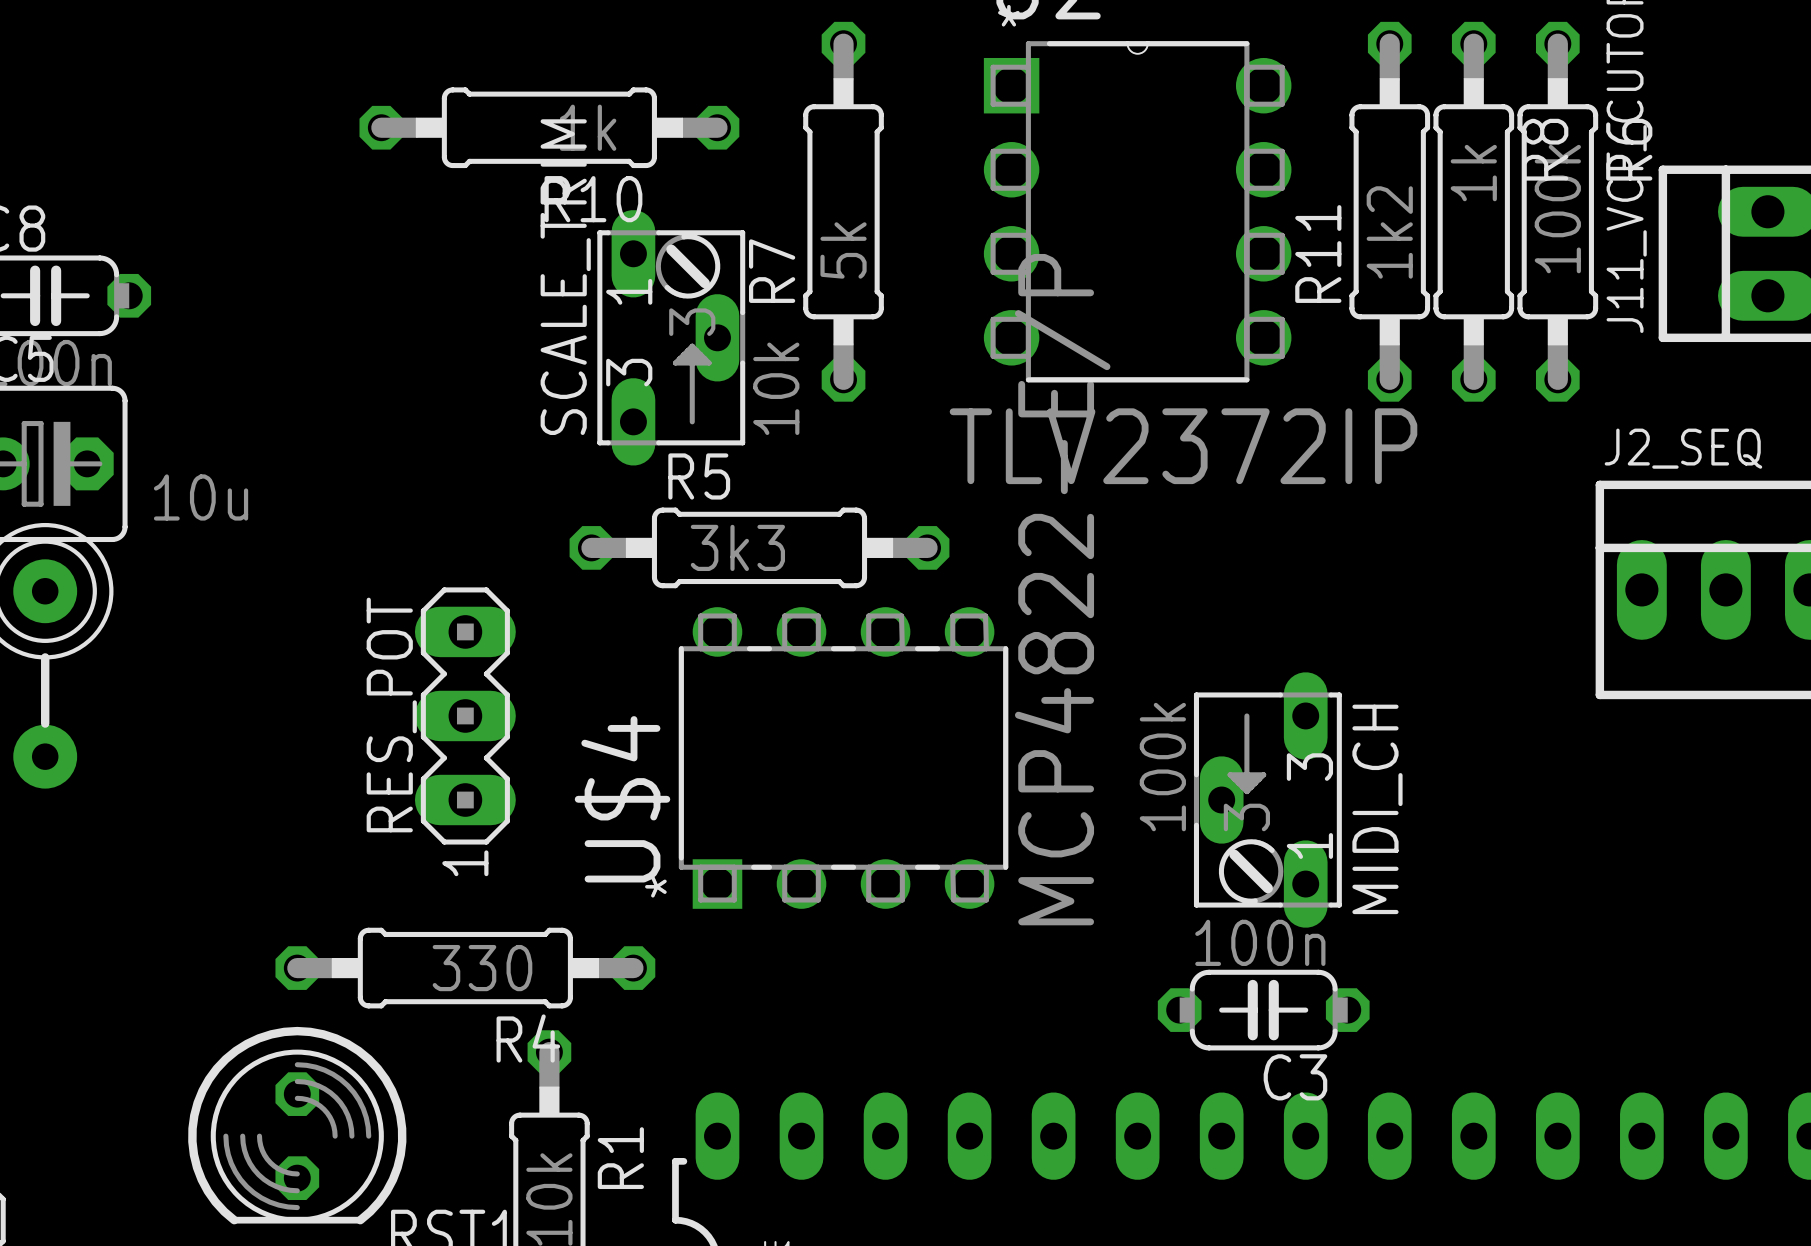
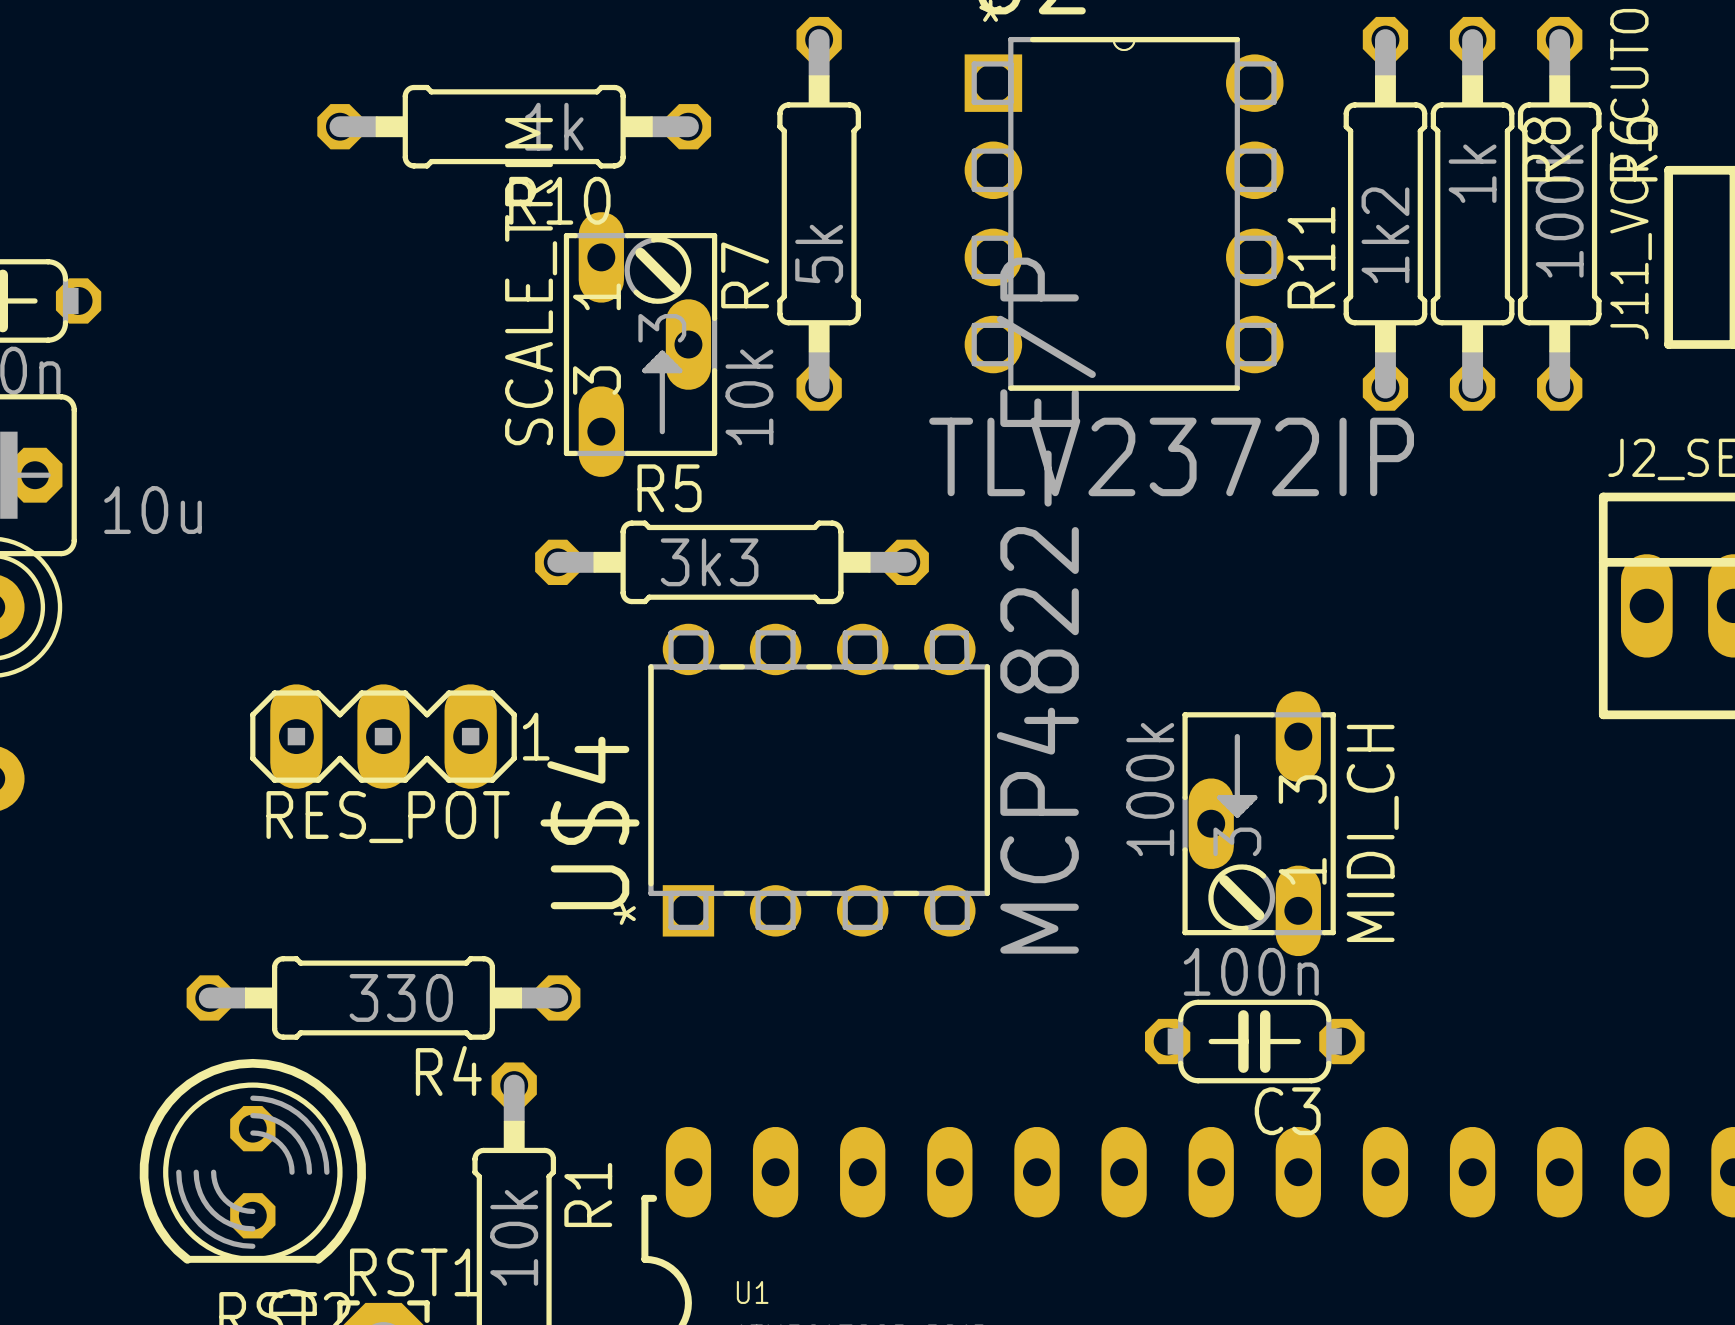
RES_POT: none -> (383, 736)
RES_POT: (465, 715) -> none
R4 position: (465, 968) -> (383, 997)

